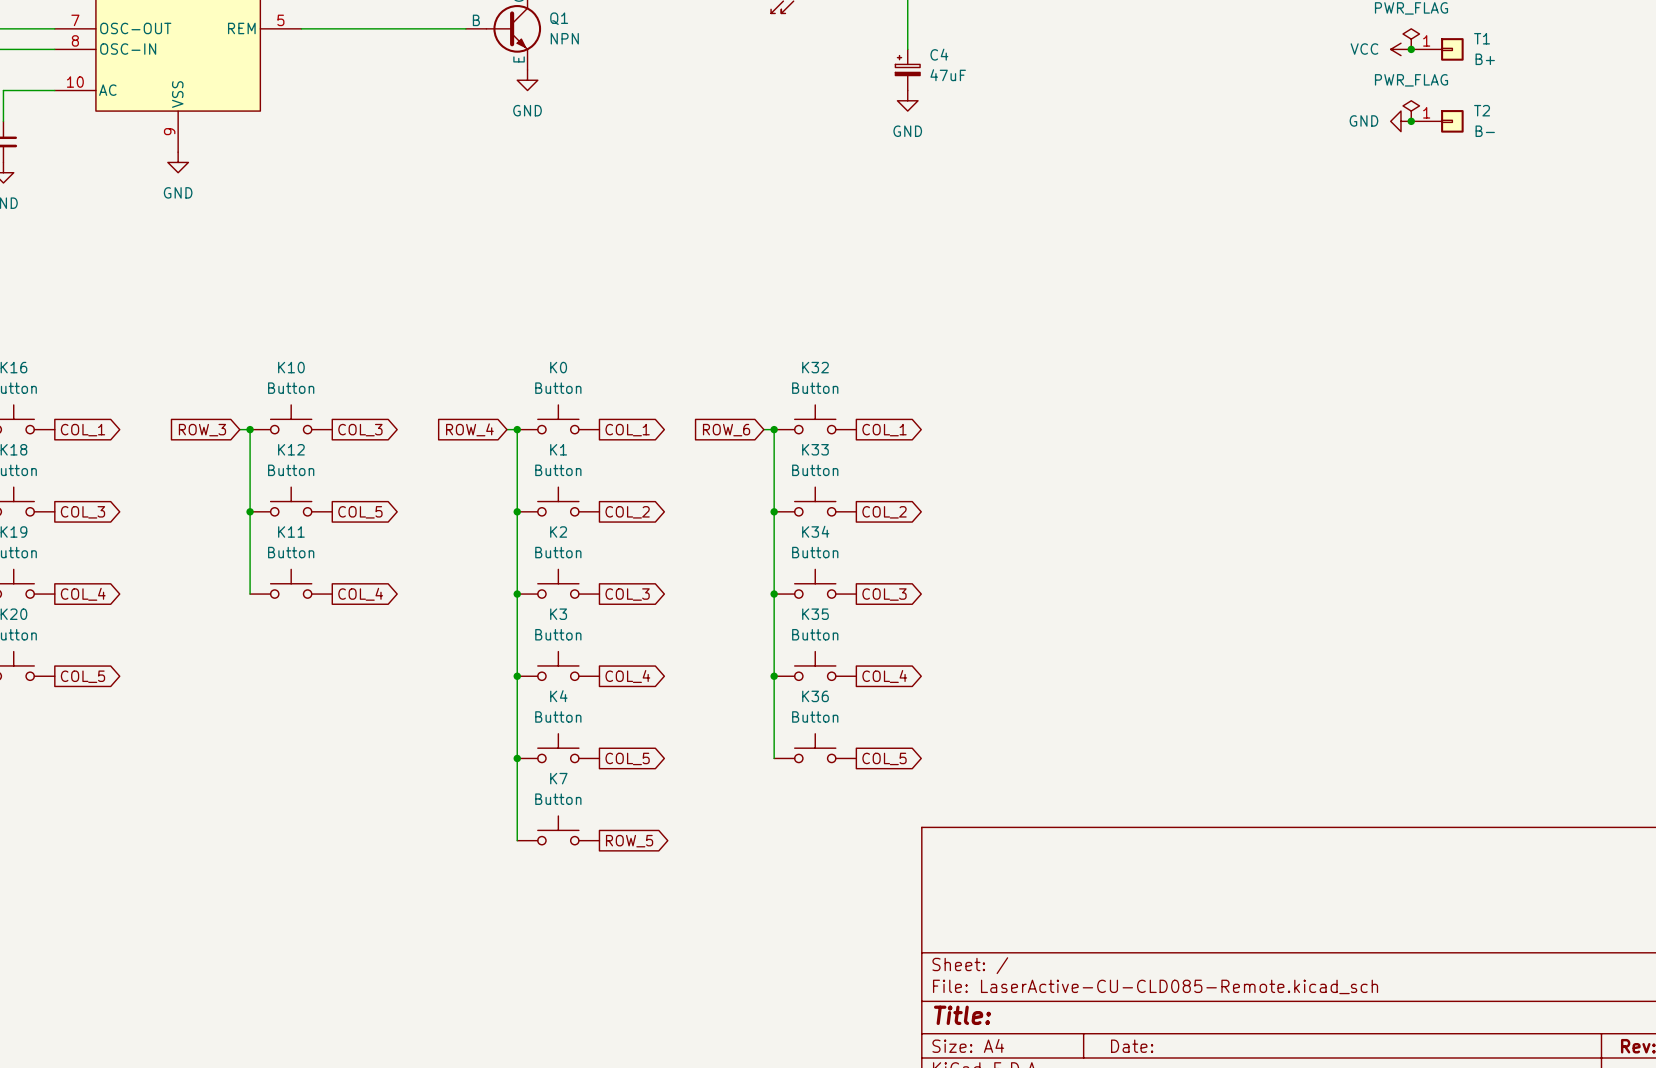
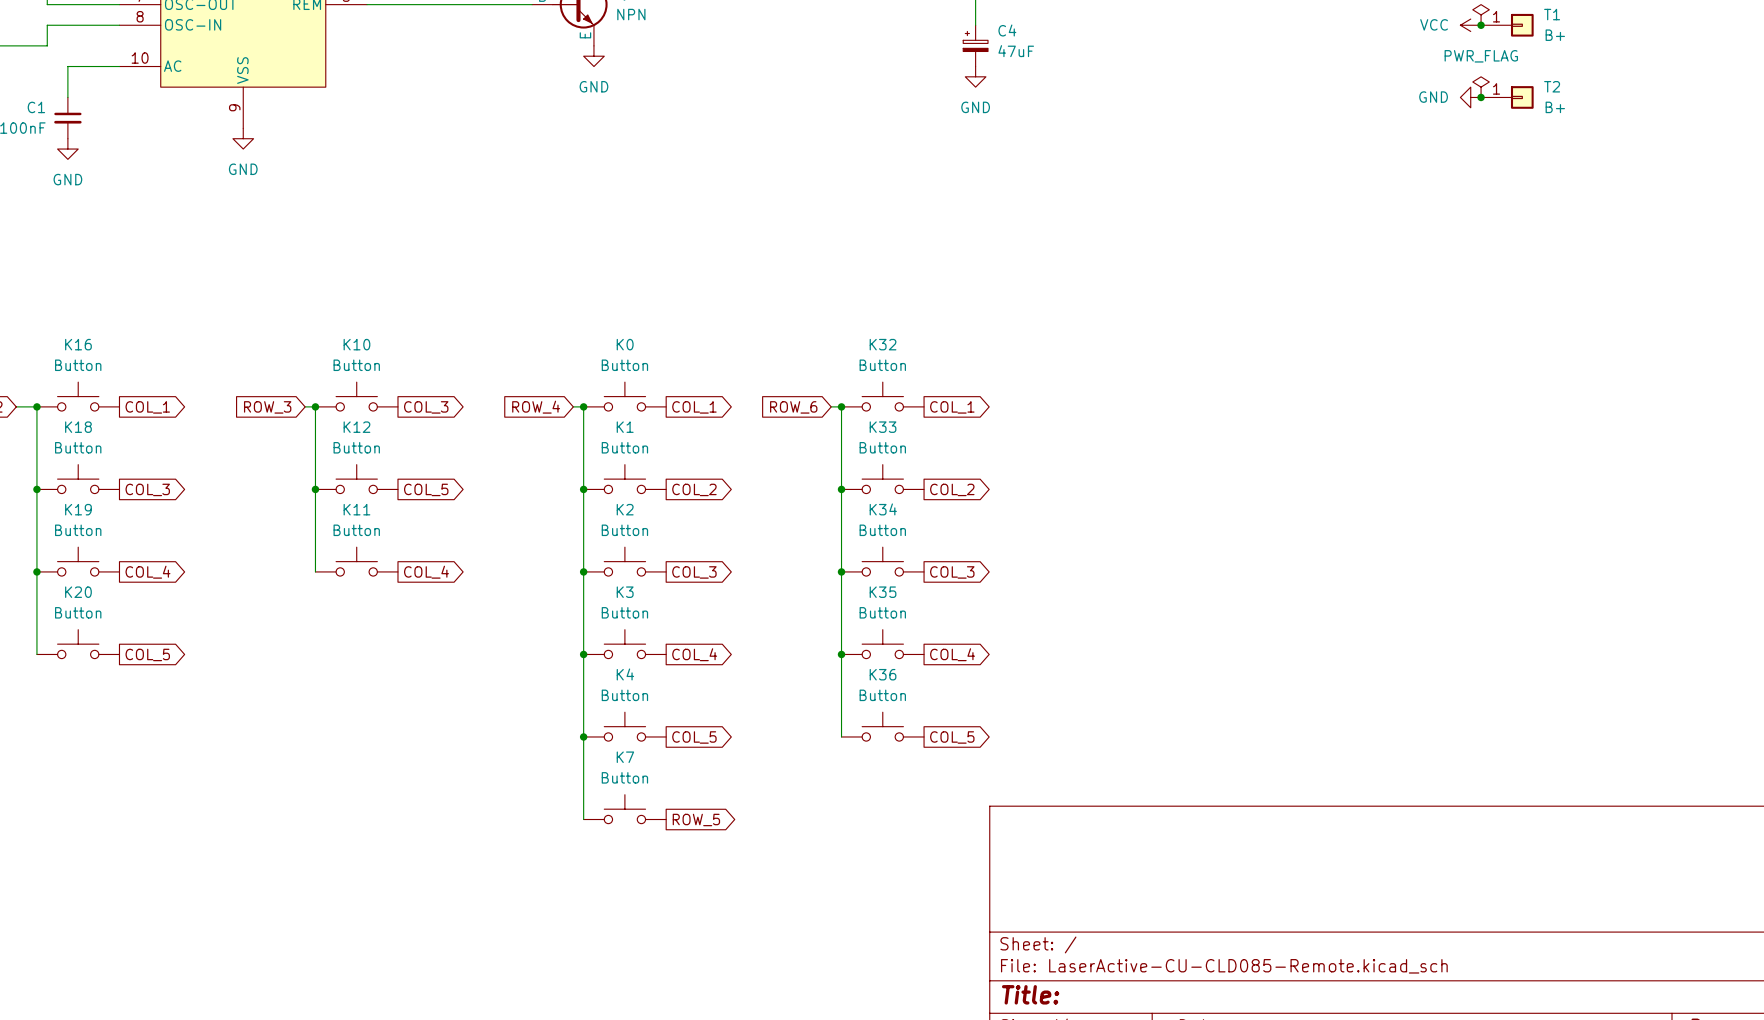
T2 value: B- (1485, 131) -> B+ (1555, 107)

